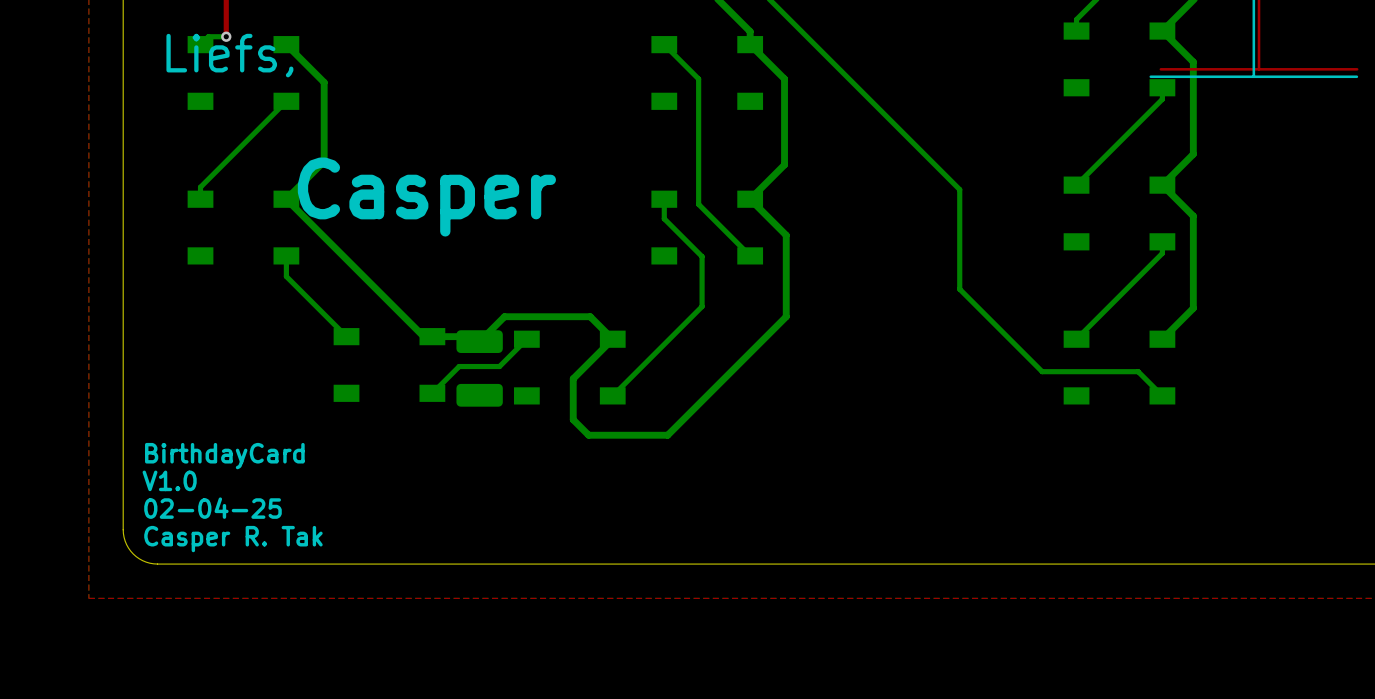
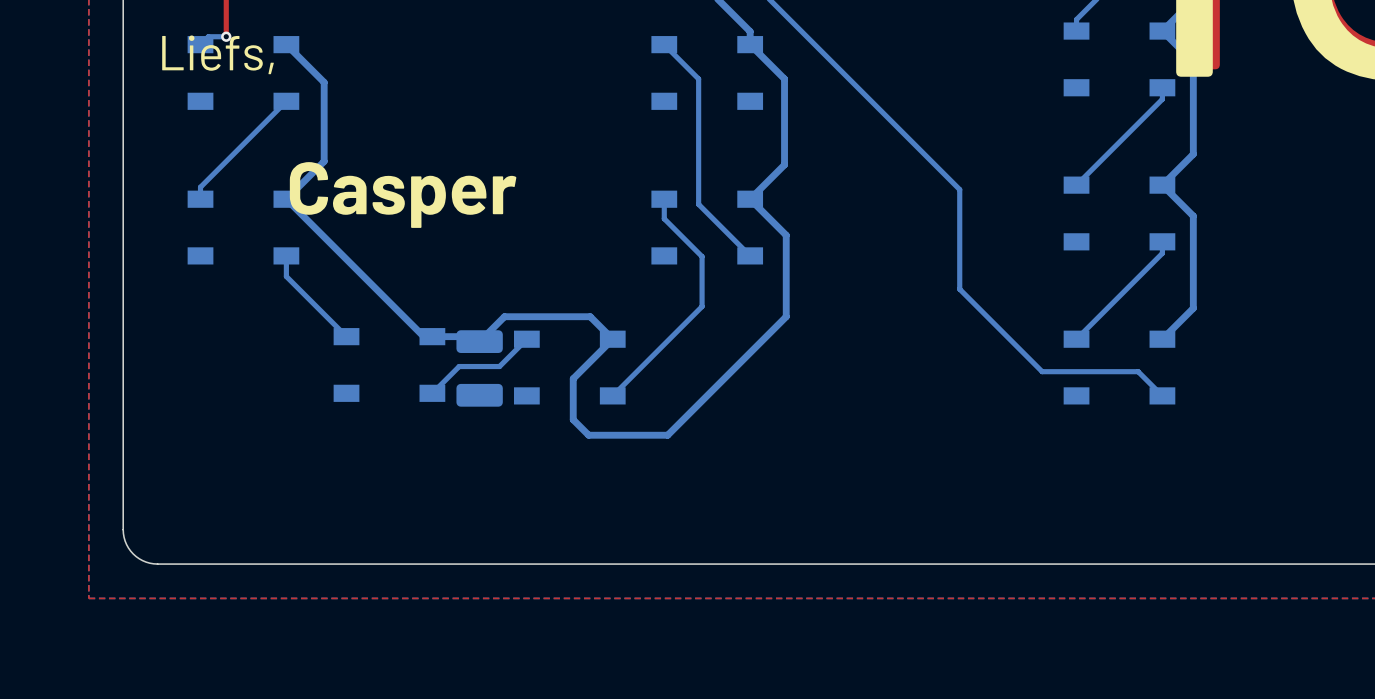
text: BirthdayCard (224, 456) -> none
text: V1.0 (169, 480) -> none
text: 02-04-25 (212, 508) -> none
text: Casper R. Tak (233, 539) -> none

